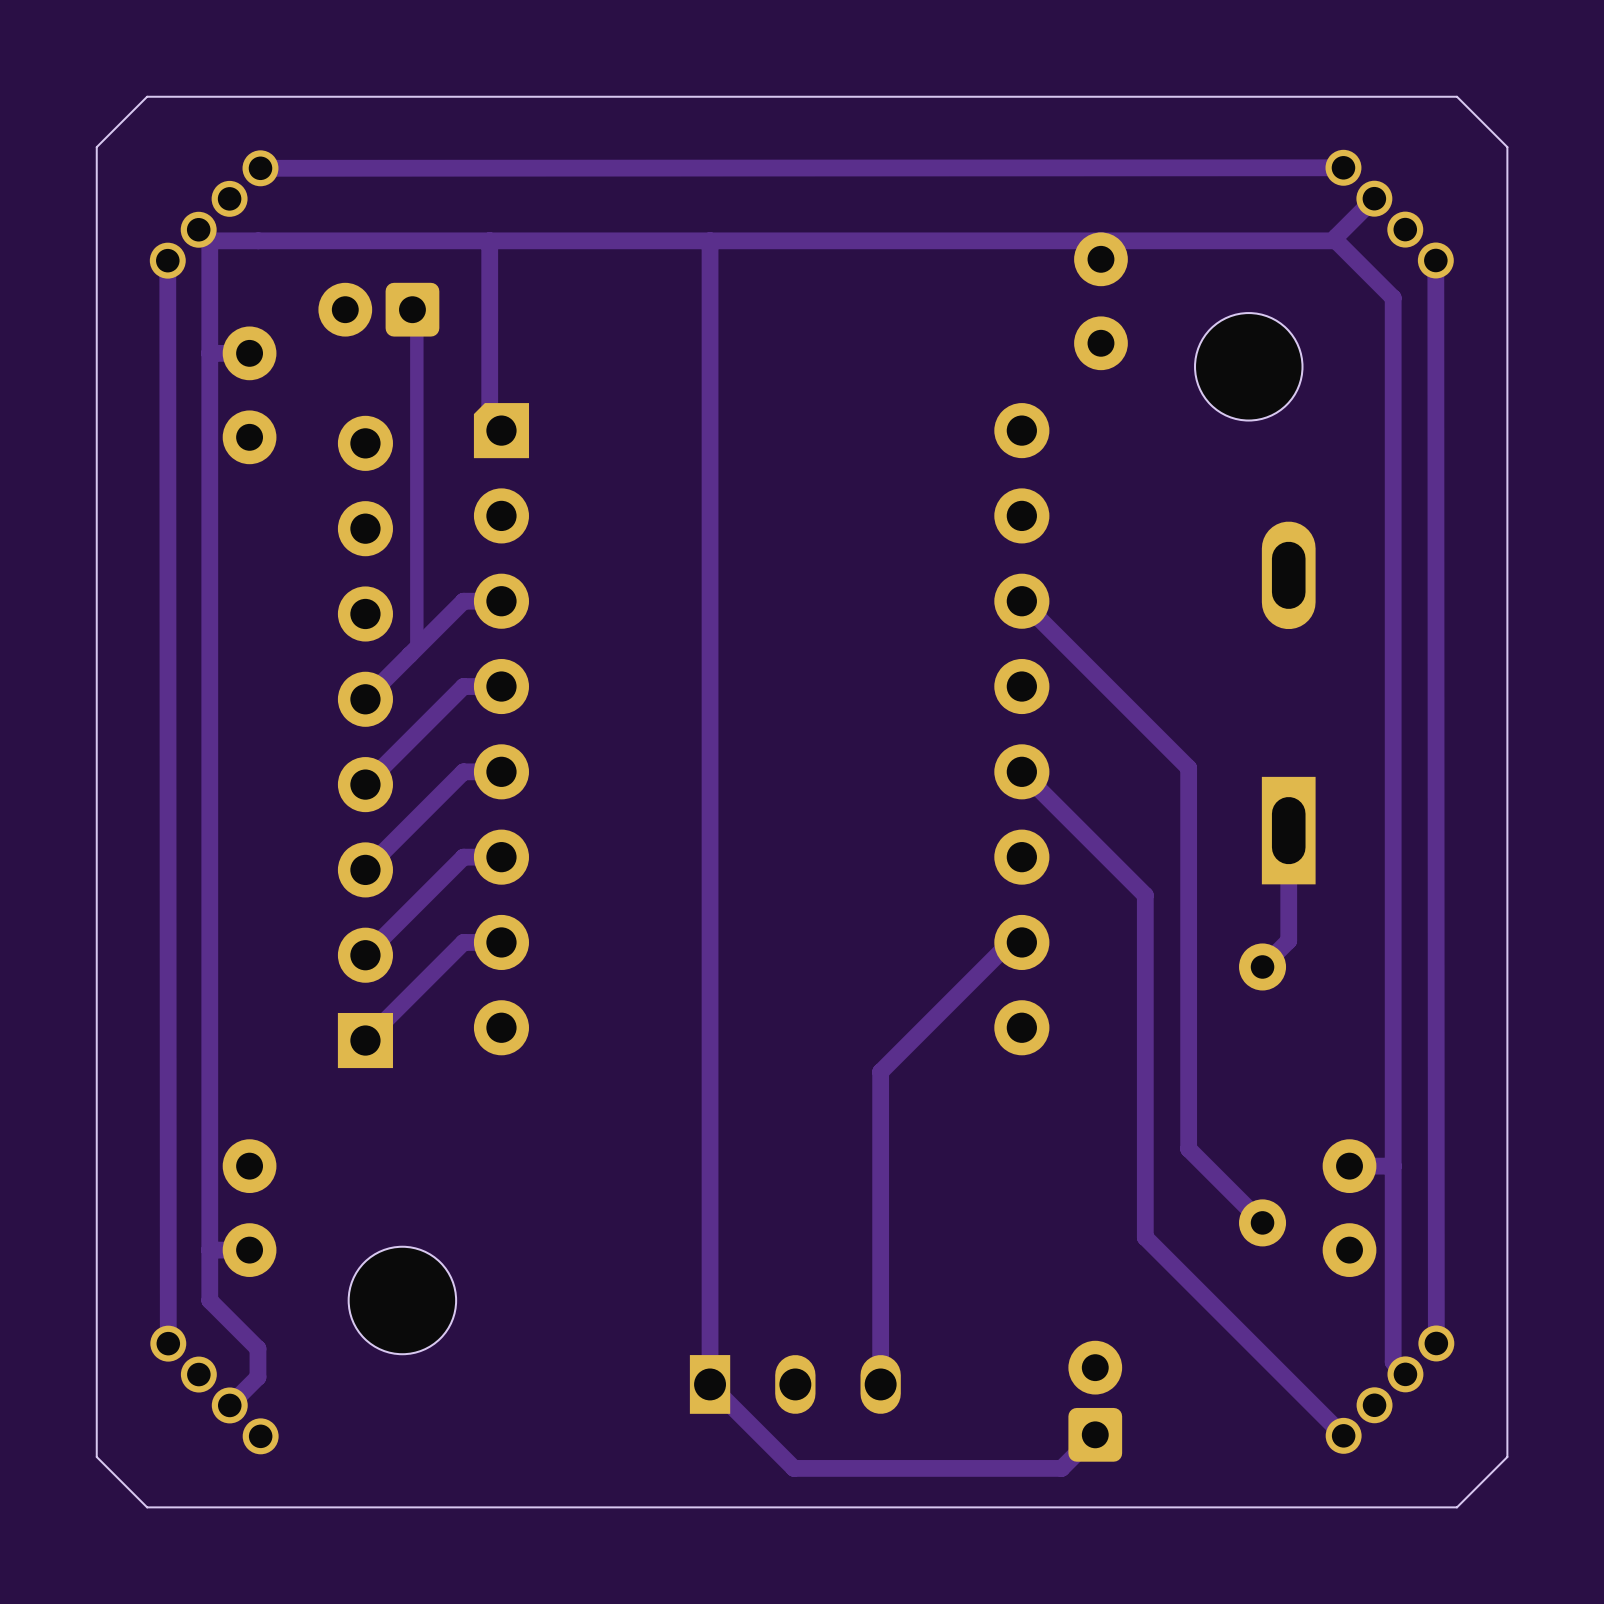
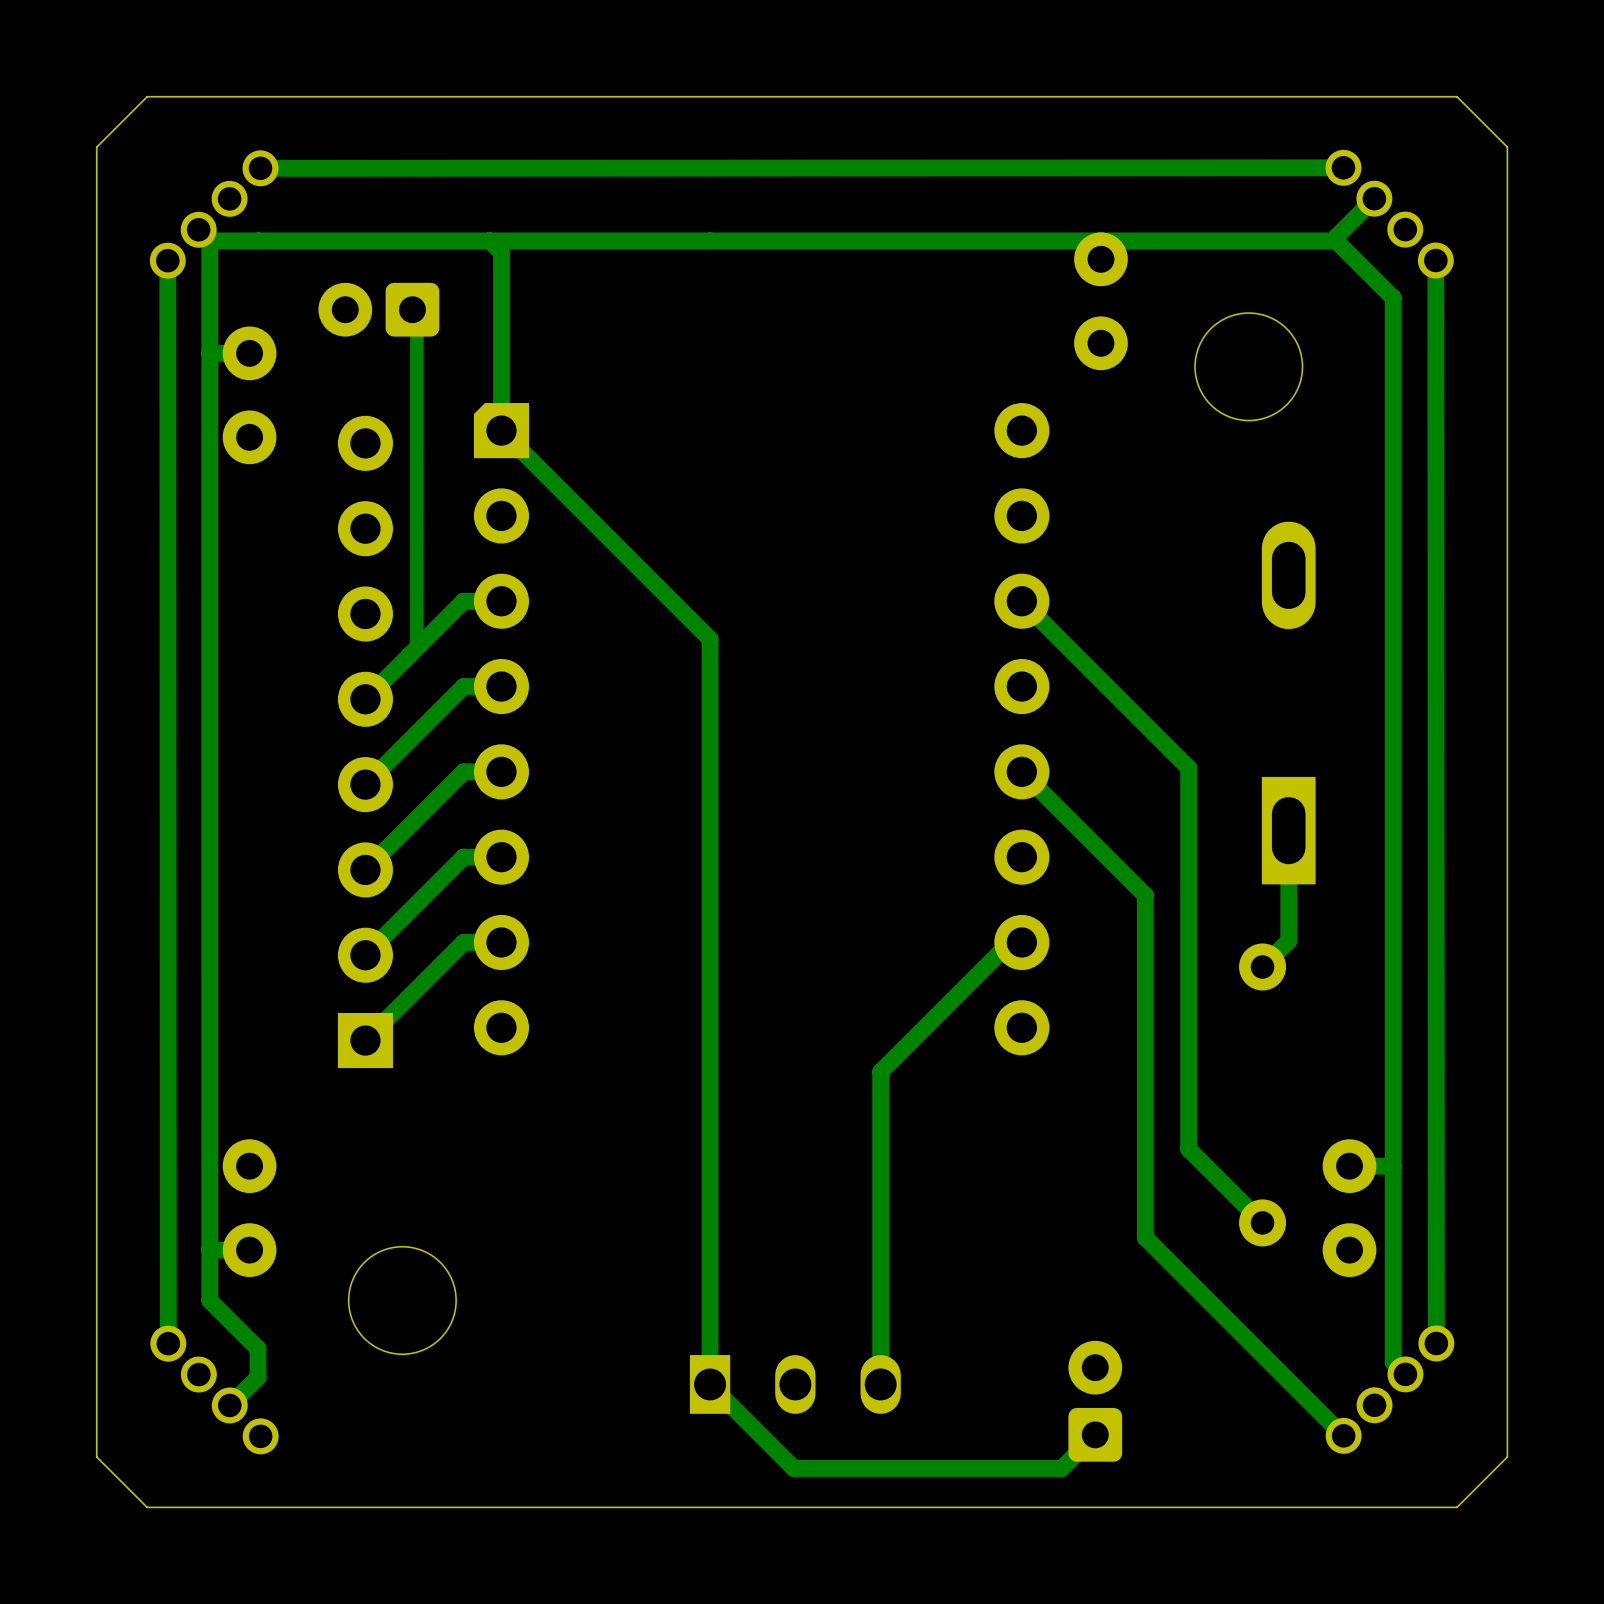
track: (489, 240) (489, 430) -> none
track: (710, 240) (710, 639) -> (489, 240) (501, 252) (501, 430) (710, 639)

